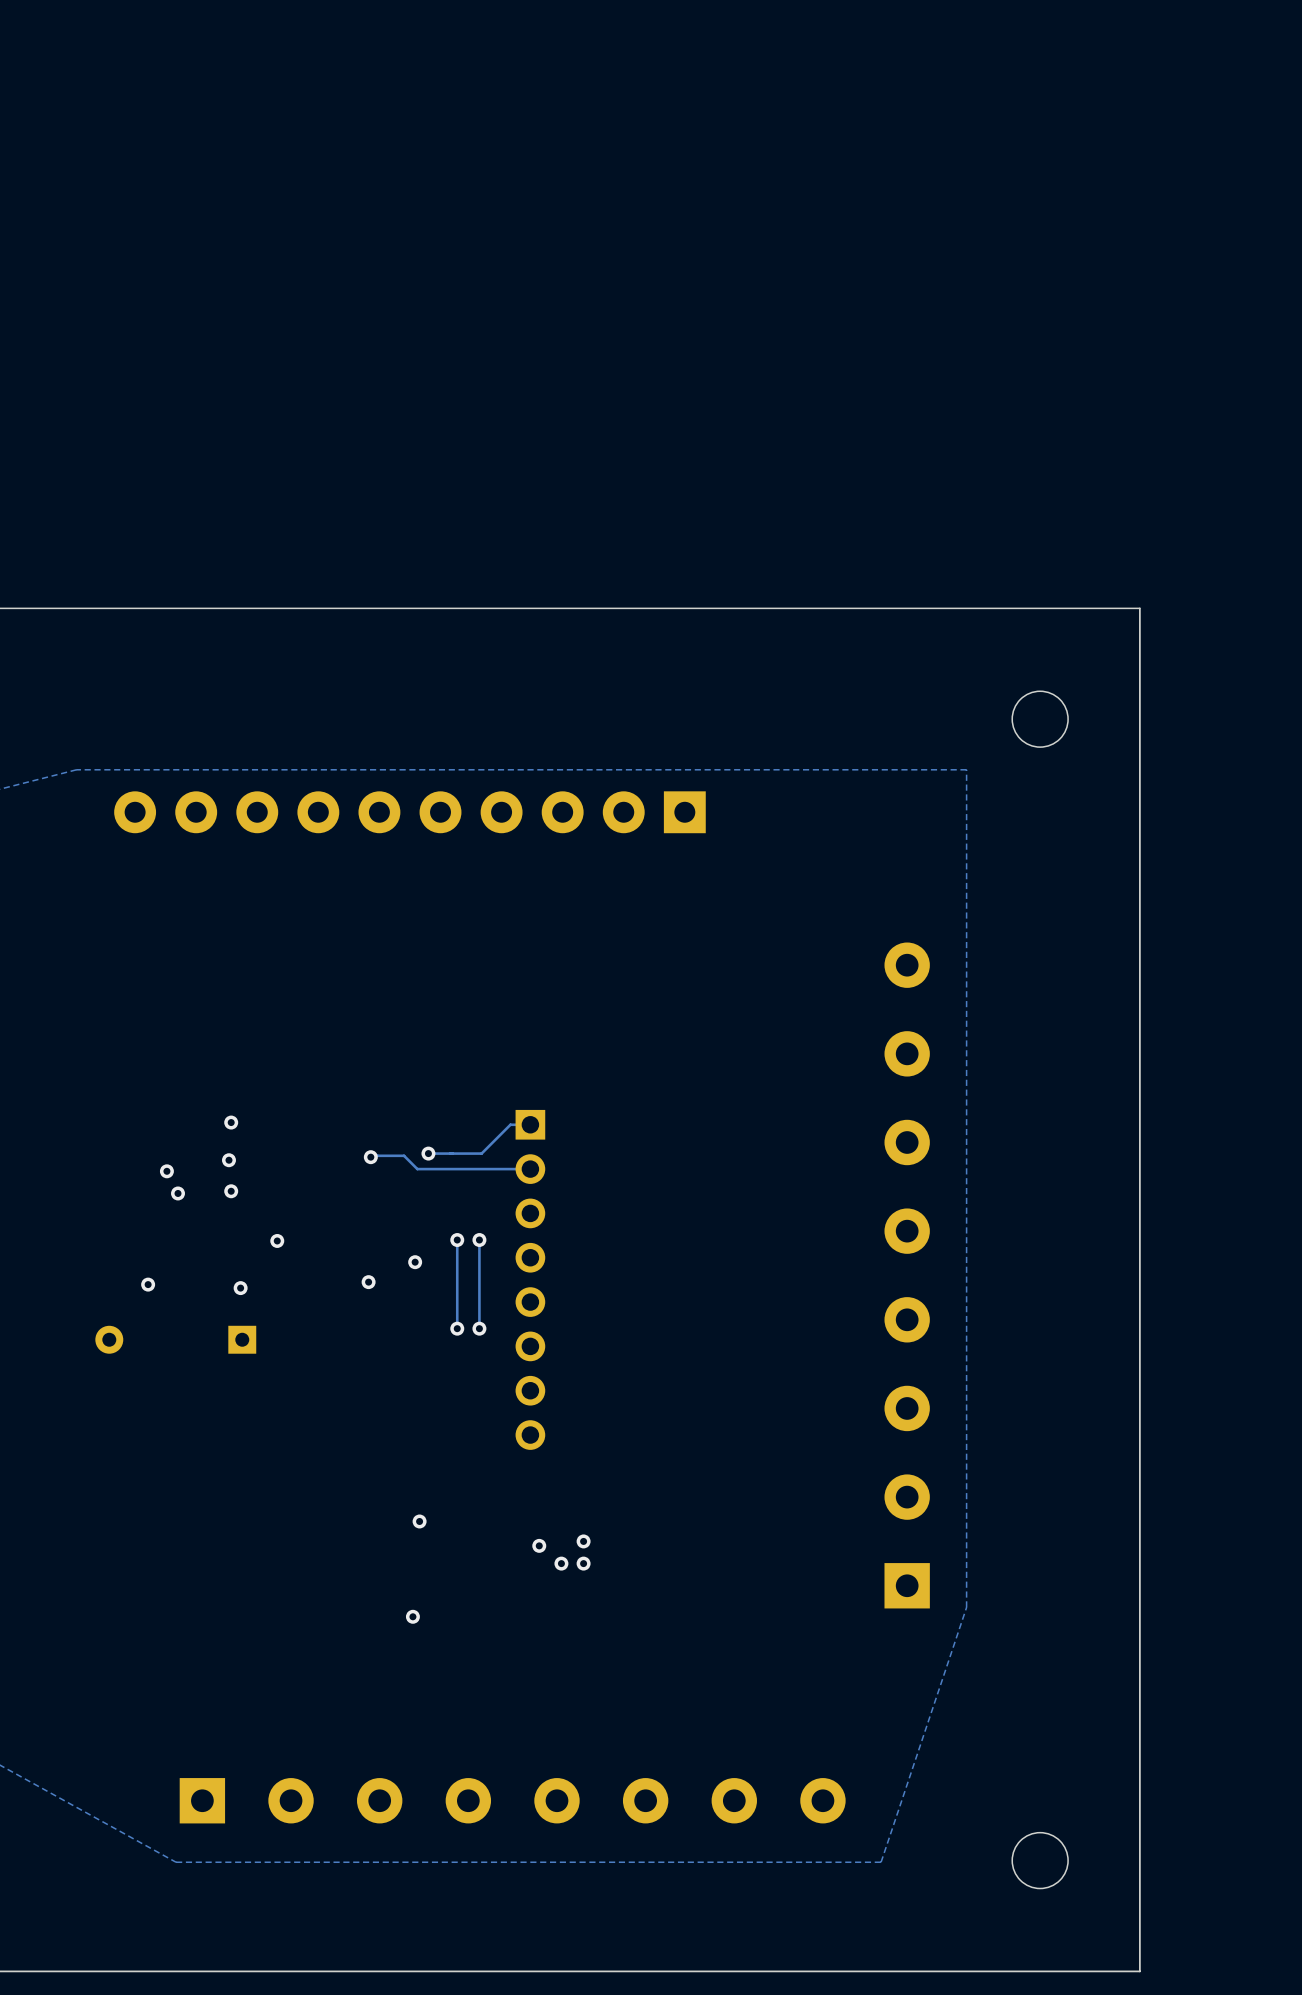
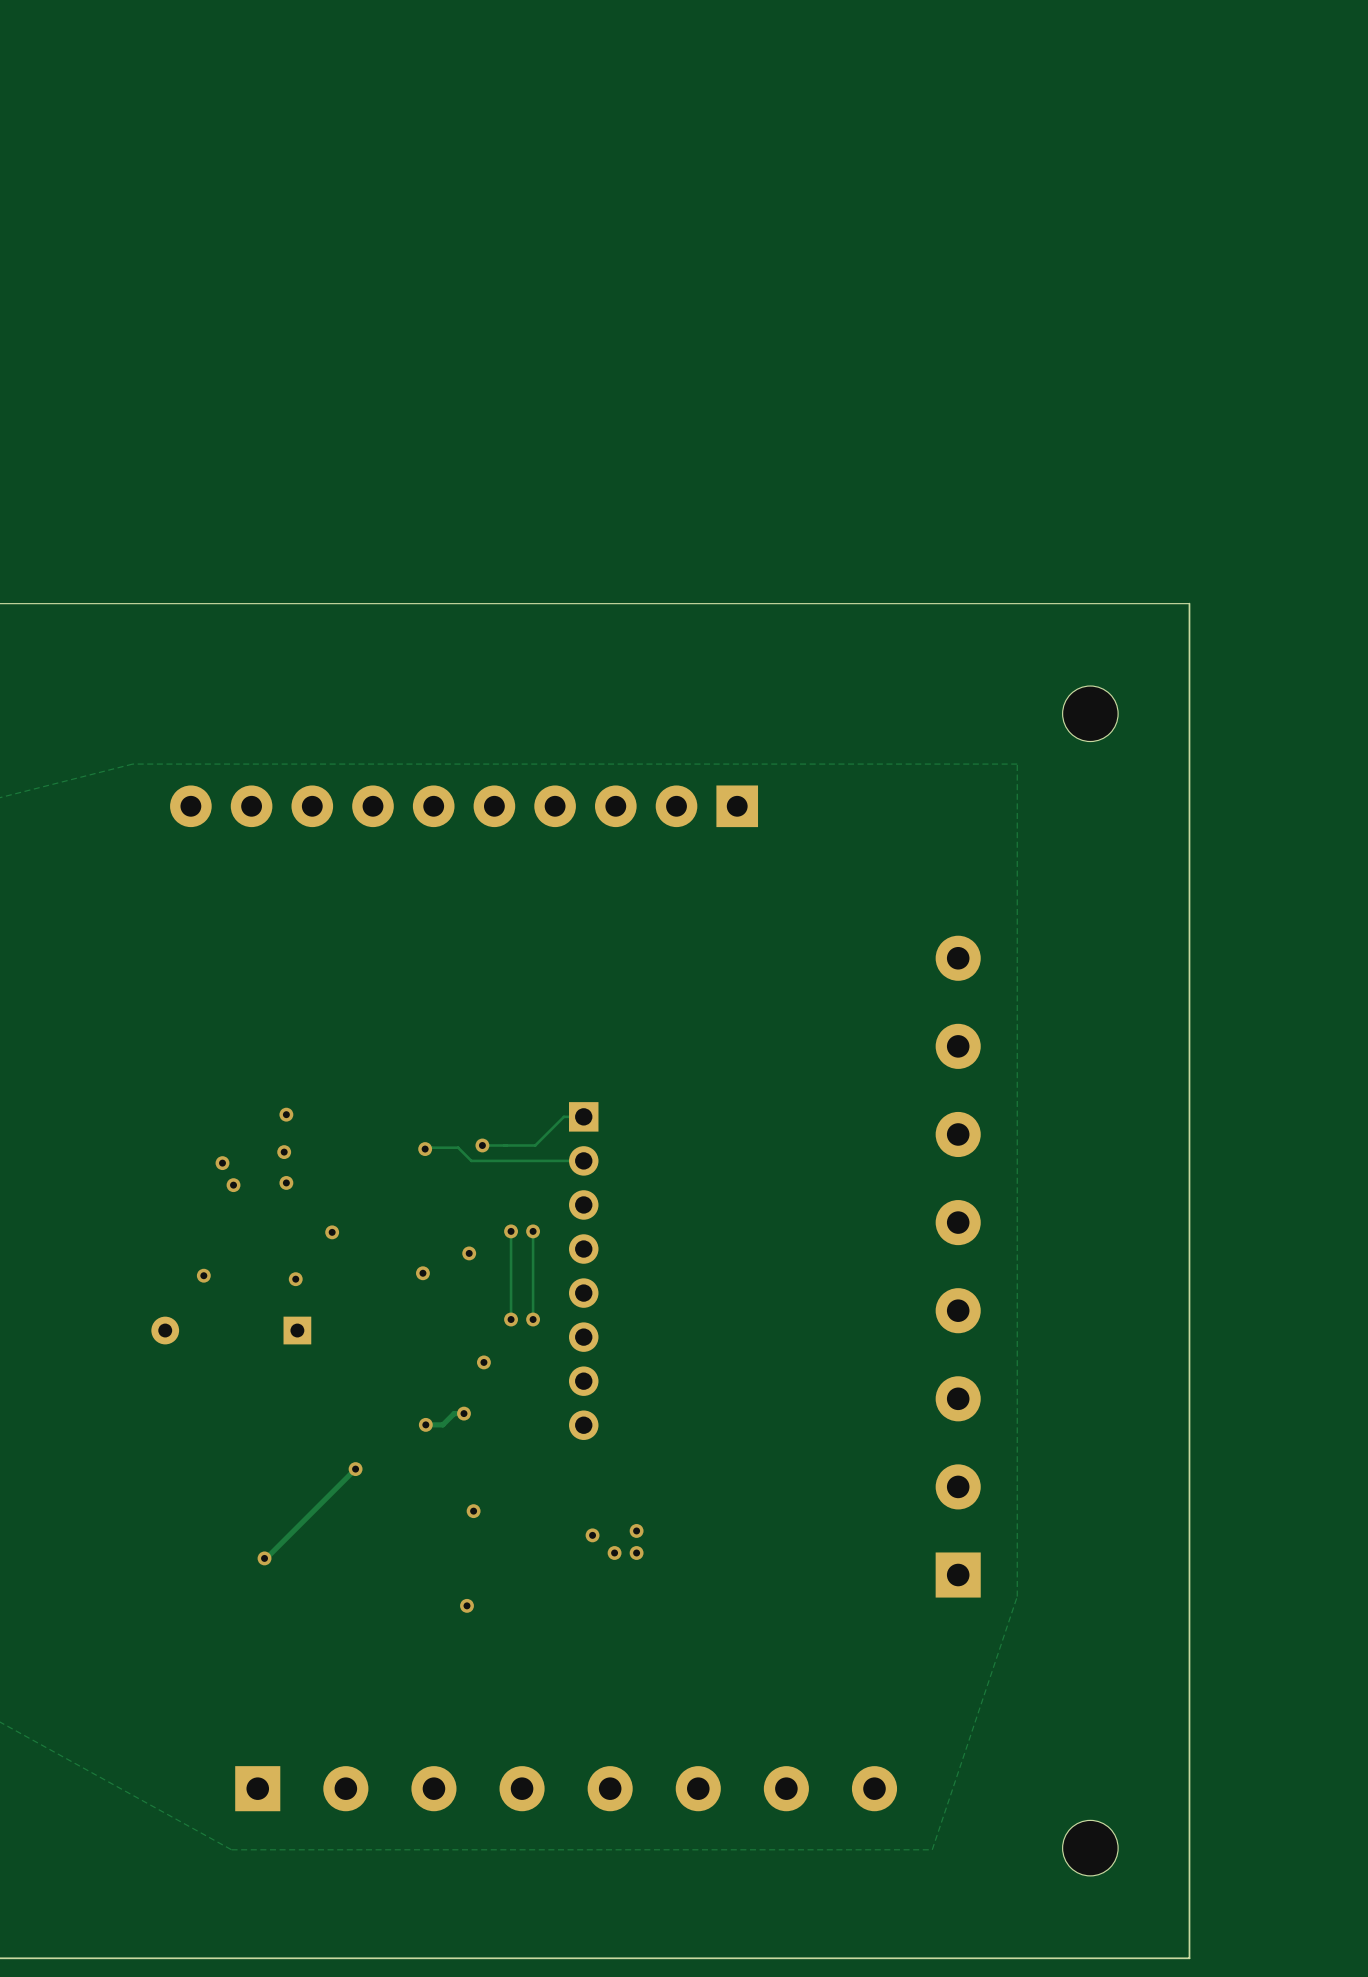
via: none -> (483, 1362)
track: none -> (463, 1413) (454, 1413) (442, 1424) (425, 1424)
via: none -> (463, 1413)
via: none -> (425, 1424)
track: none -> (355, 1469) (264, 1558)
via: none -> (355, 1469)
via: none -> (264, 1558)

